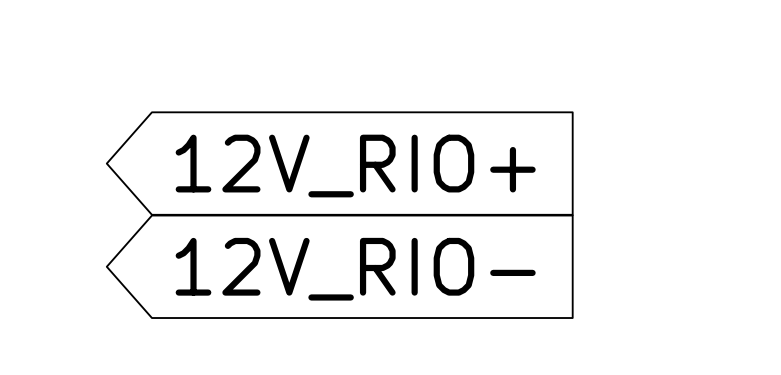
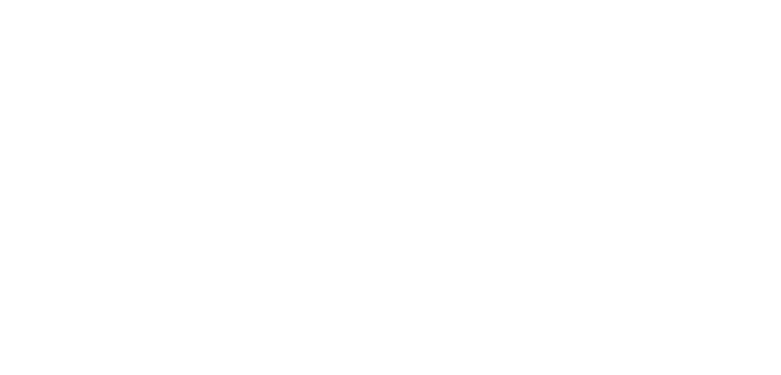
global label: 12V_RIO+ (355, 166) -> none
global label: 12V_RIO- (355, 269) -> none

